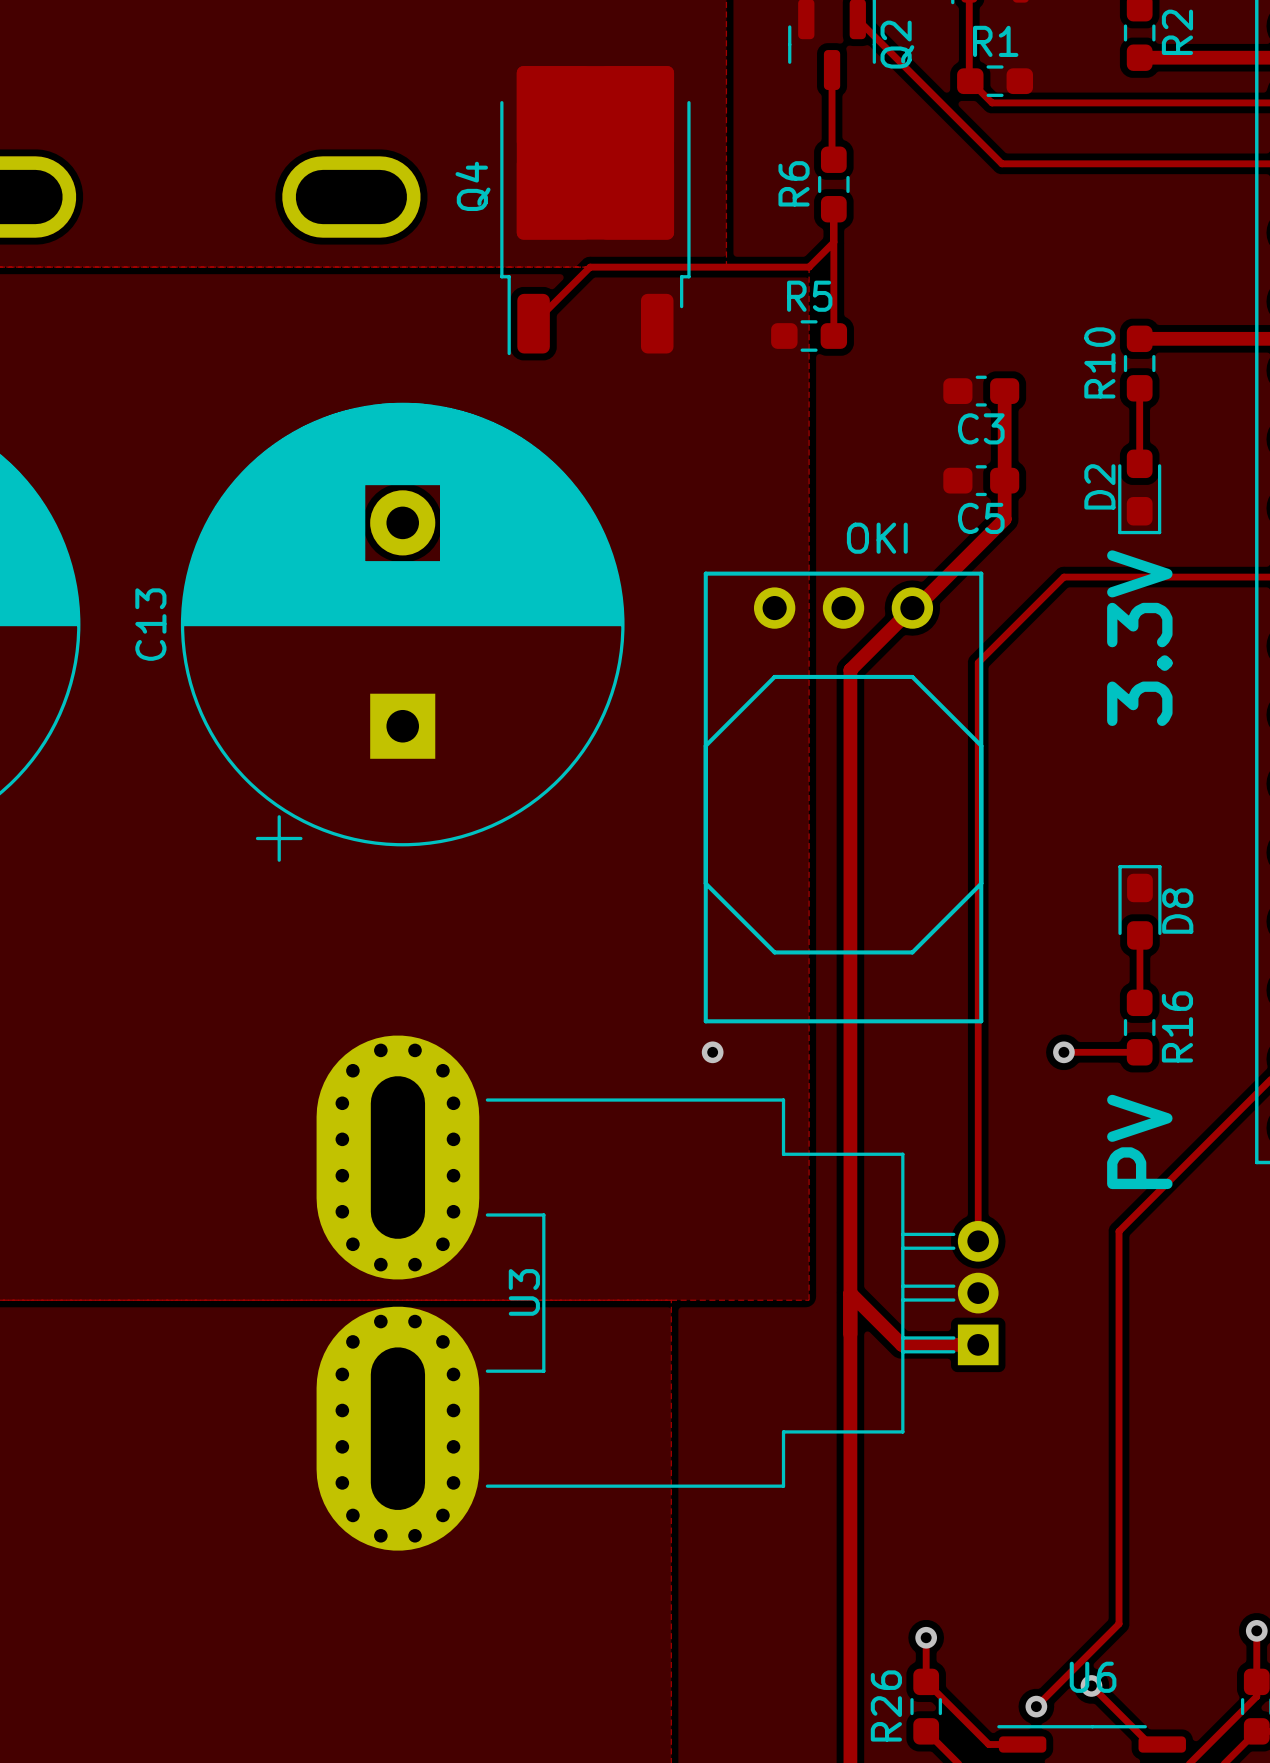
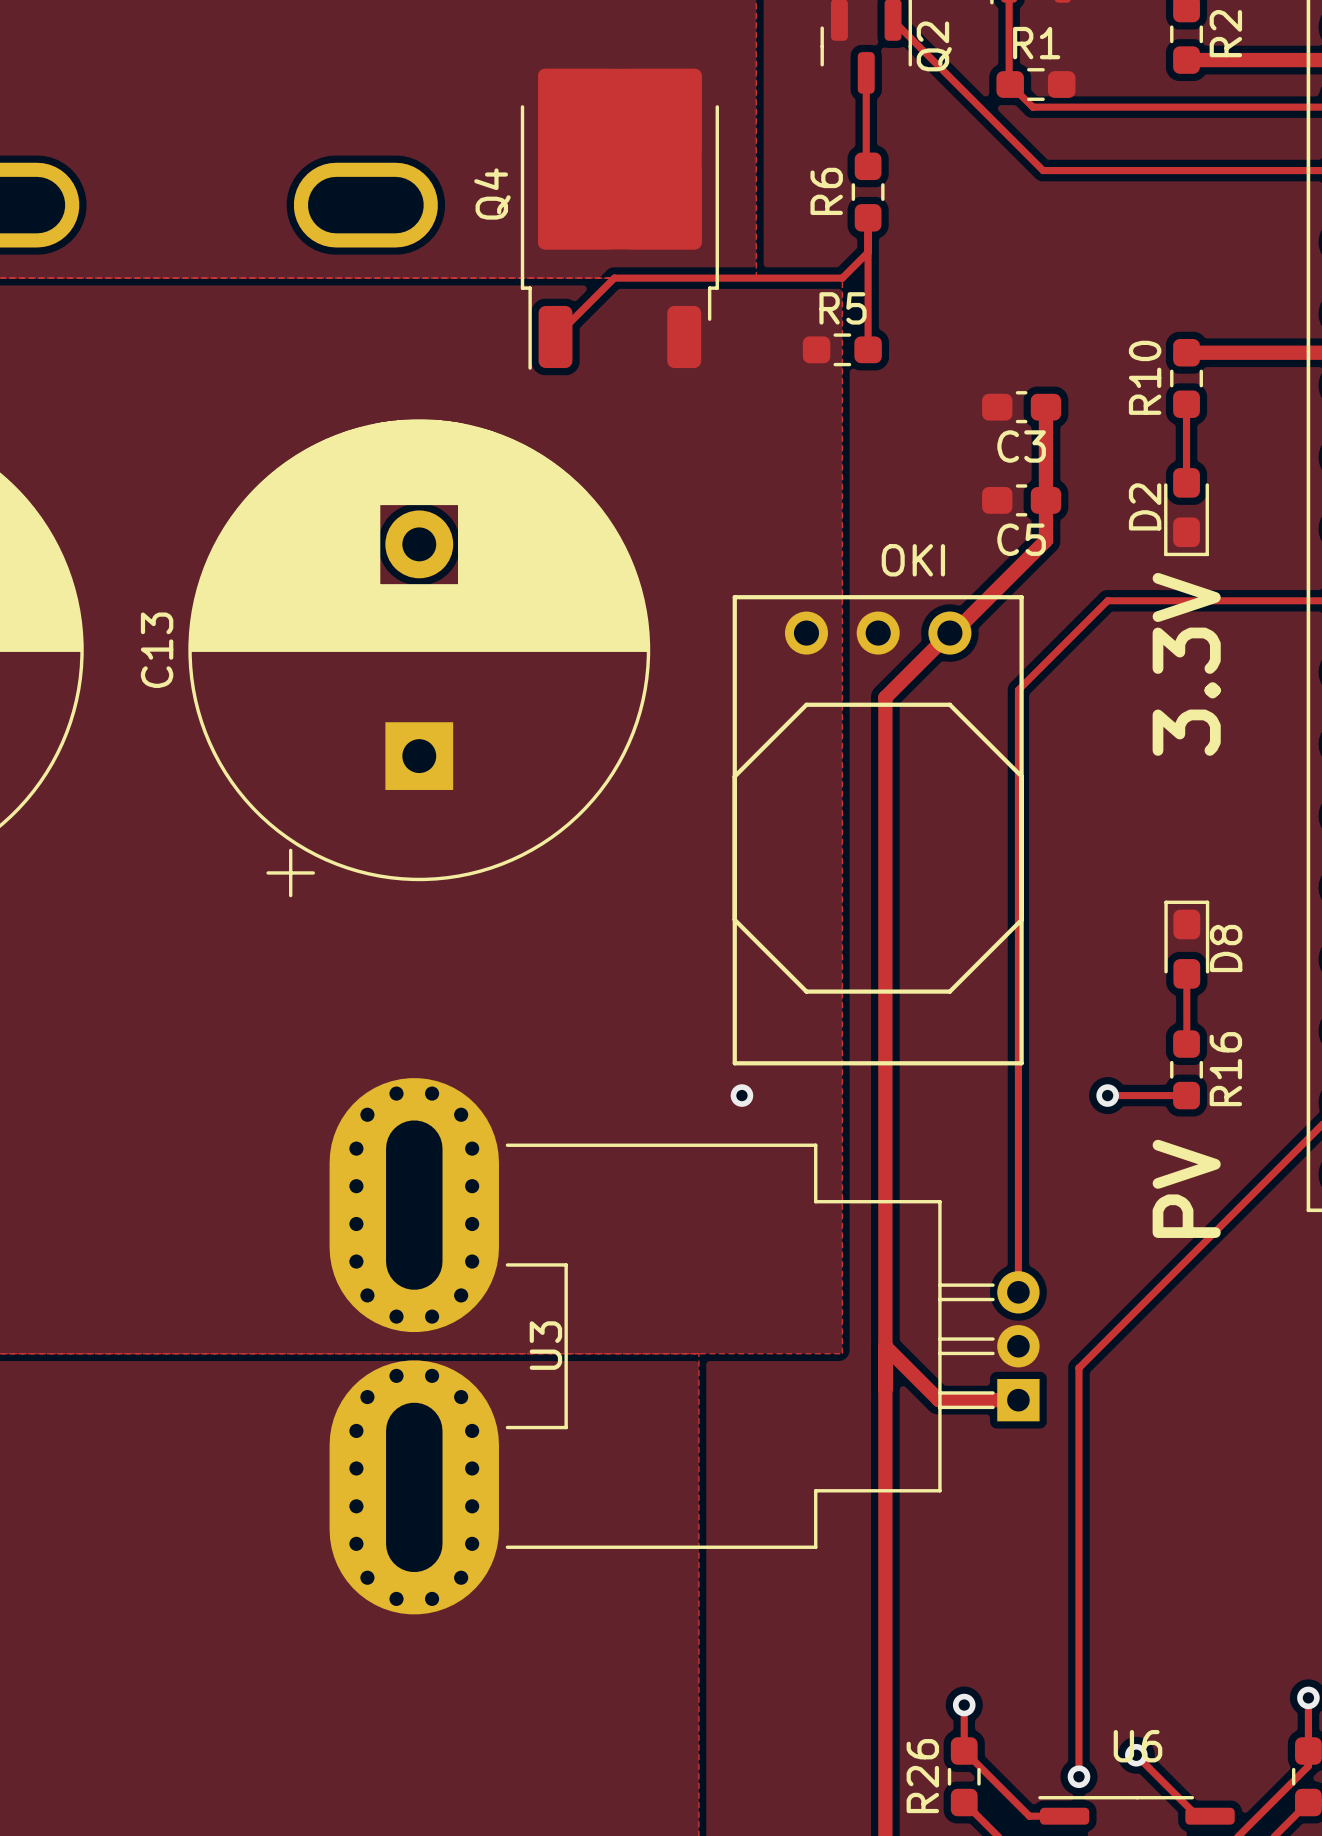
track: (1119, 1231) (1119, 1623) (1036, 1706) -> (1165, 1281) (1078, 1368) (1078, 1776)

